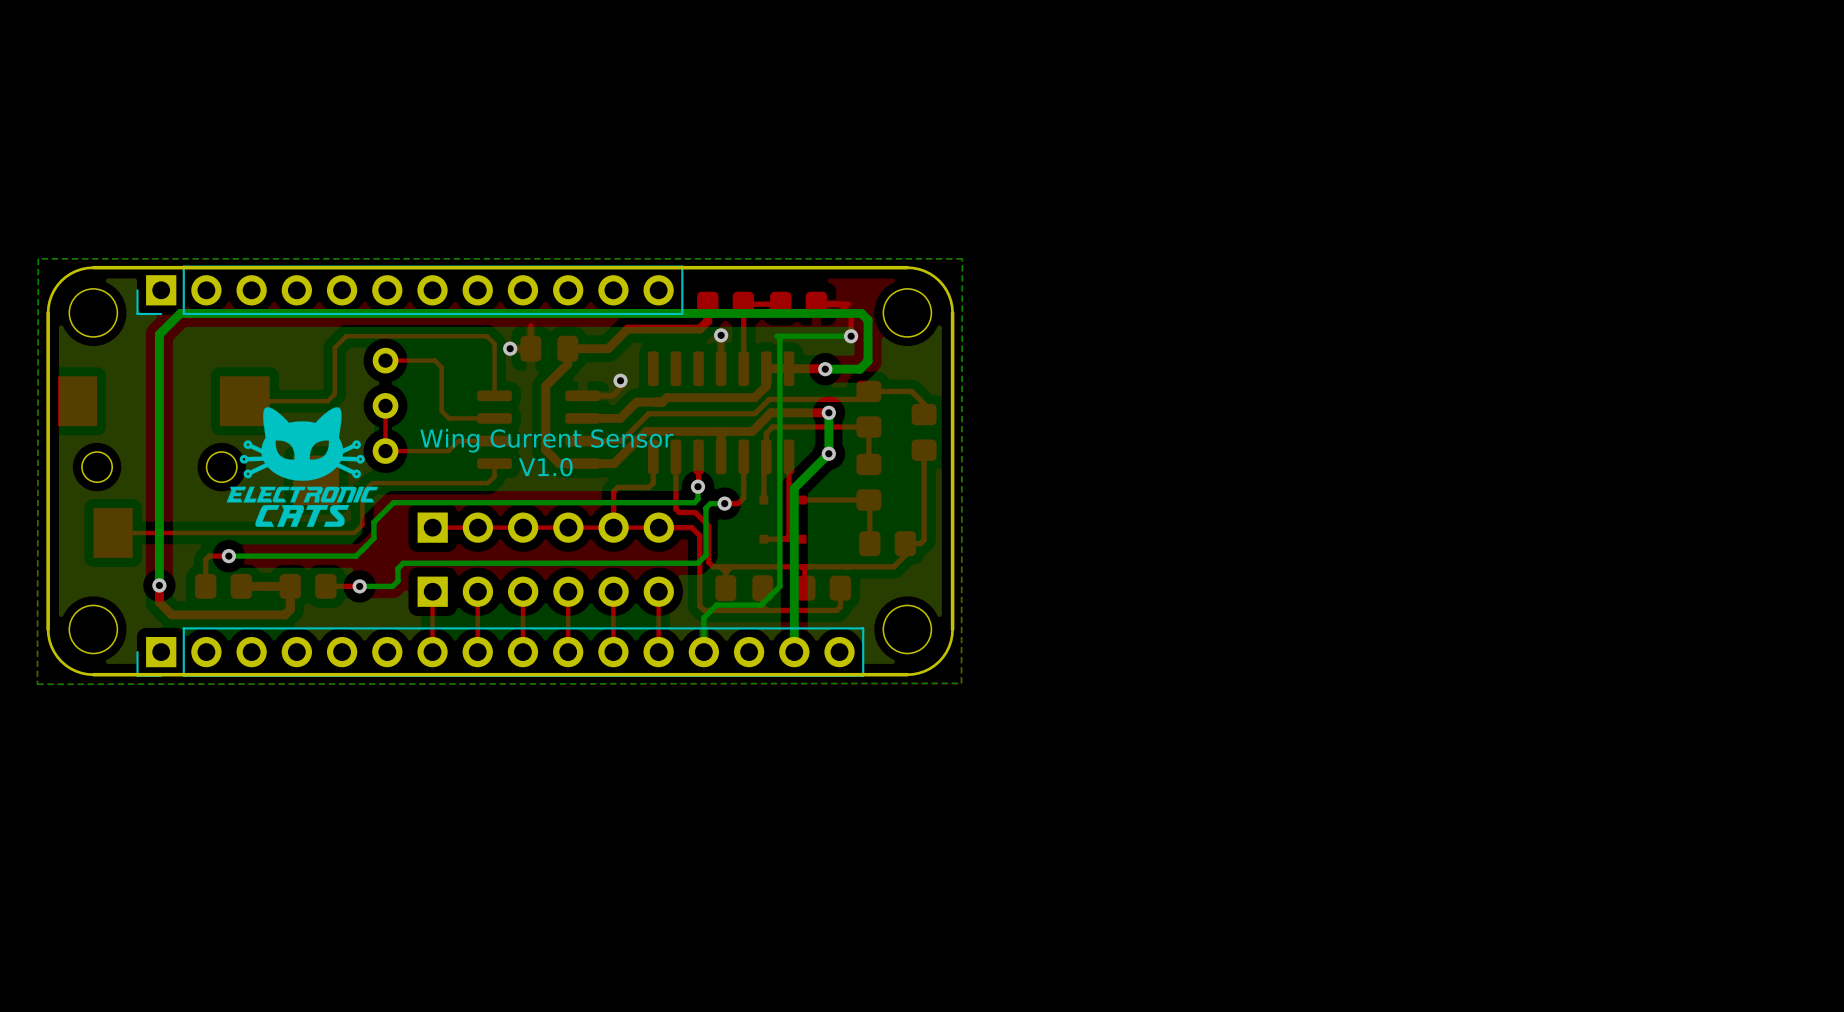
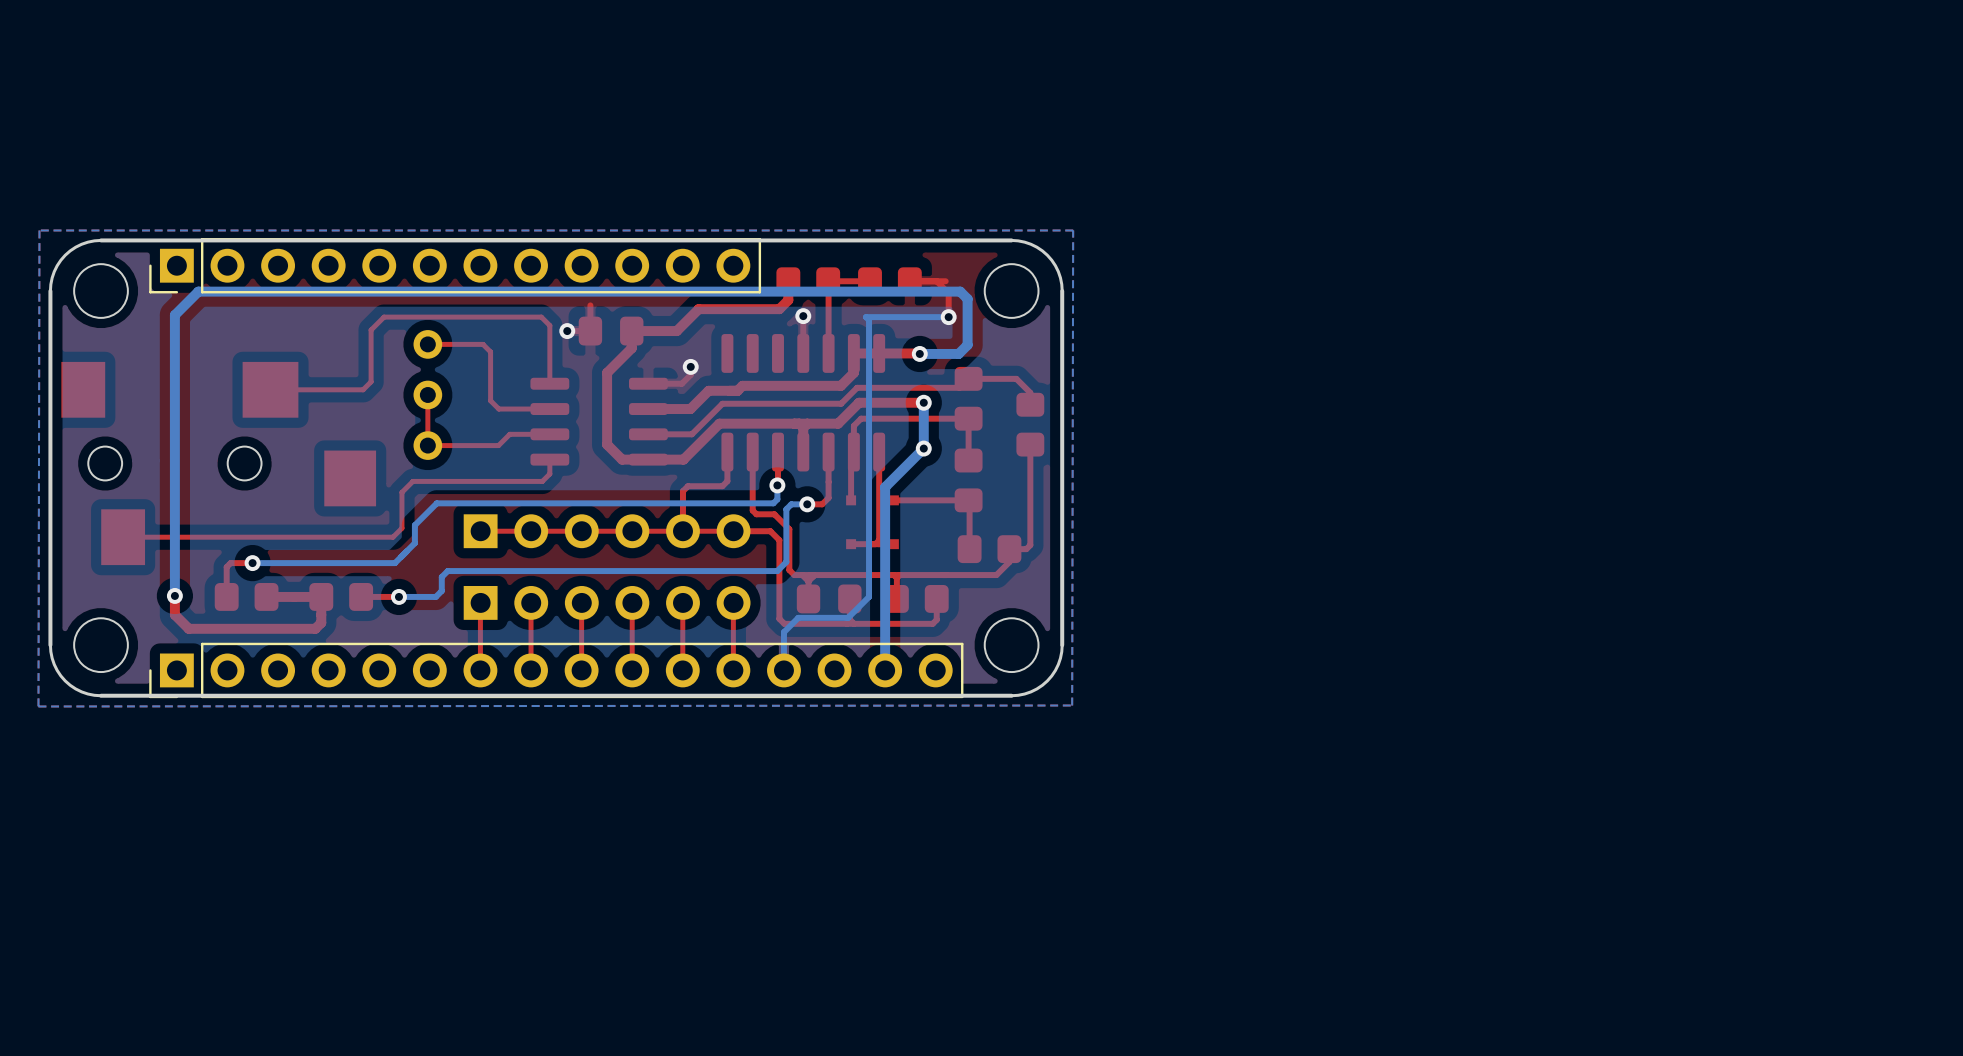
drawing: [226, 407, 378, 527] -> none
text: Wing Current Sensor (546, 440) -> none
text: V1.0 (545, 467) -> none

